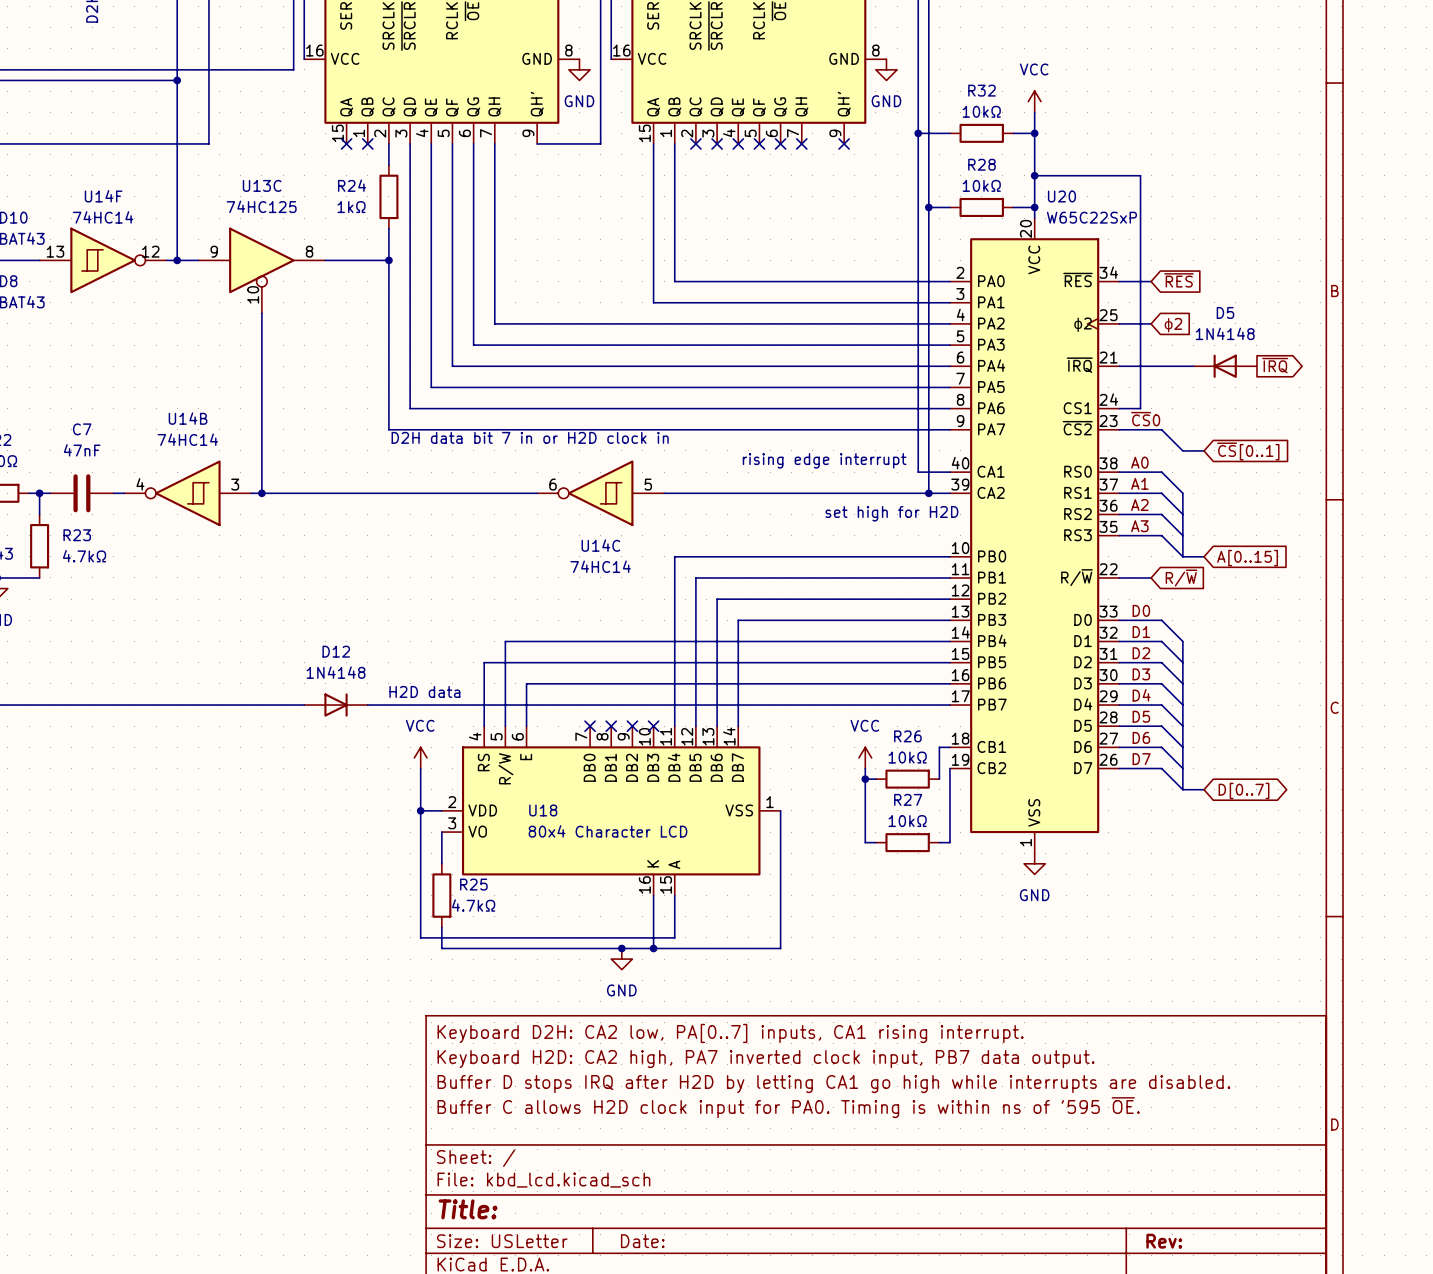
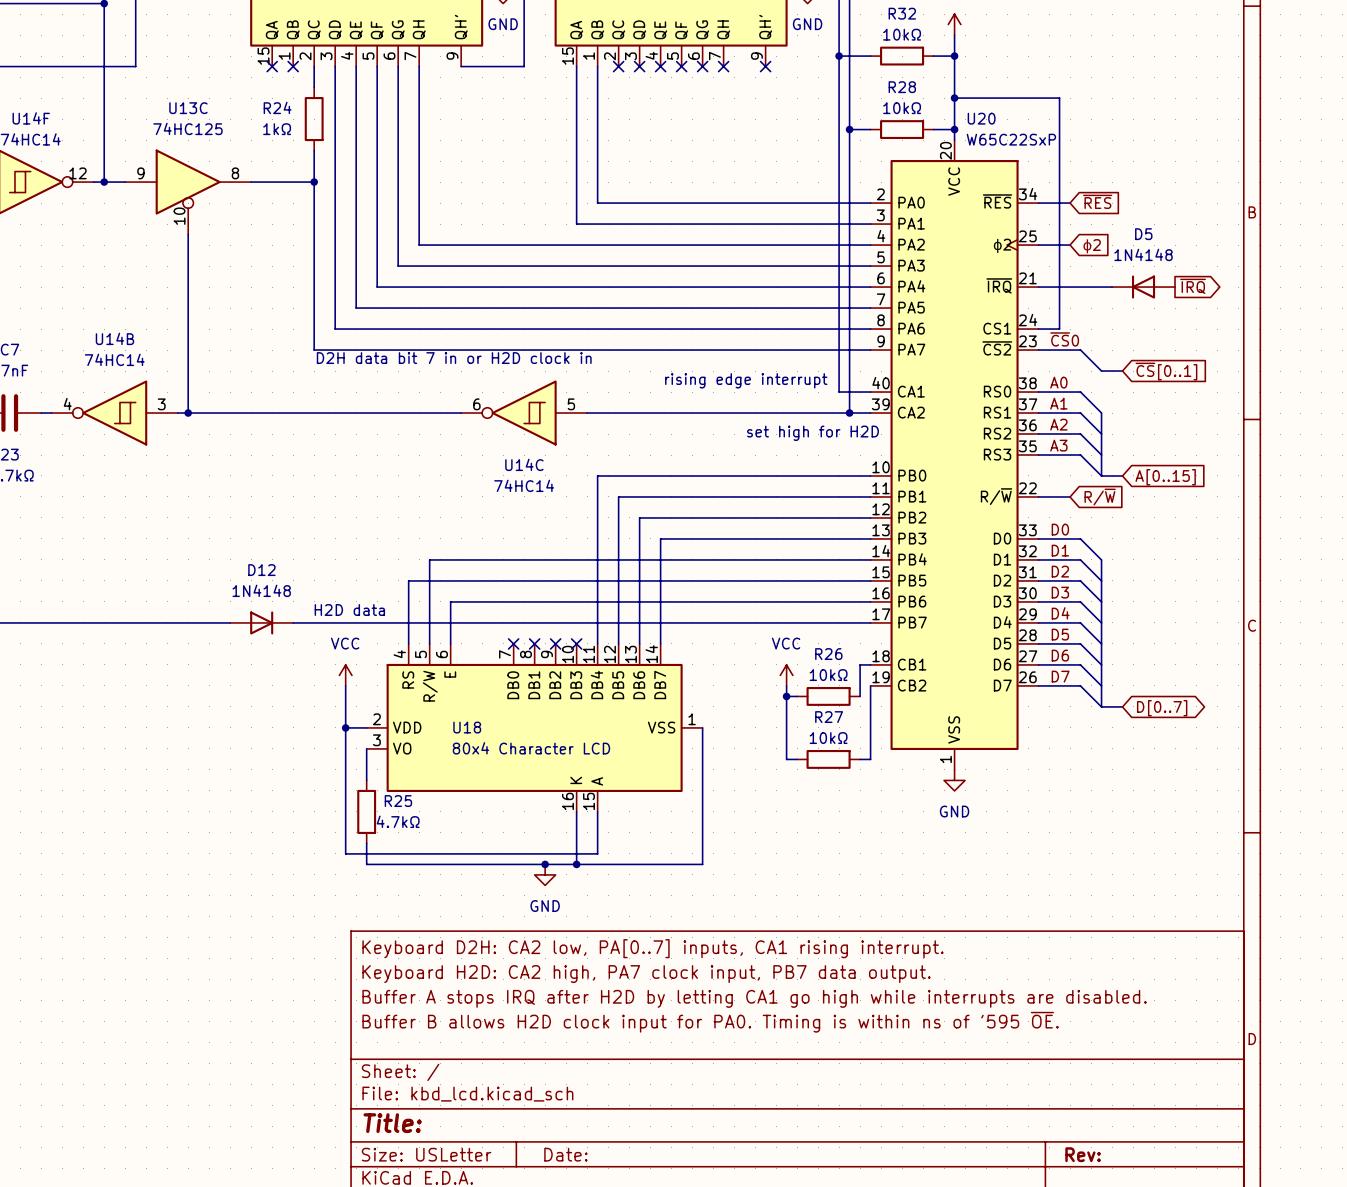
title block: Keyboard H2D: CA2 high, PA7 inverted clock input, PB7 data output. (766, 1059) -> Keyboard H2D: CA2 high, PA7 clock input, PB7 data output. (646, 974)
title block: Buffer D stops IRQ after H2D by letting CA1 go high while interrupts are disabled. (833, 1084) -> Buffer A stops IRQ after H2D by letting CA1 go high while interrupts are disabled. (754, 998)
title block: Buffer C allows H2D clock input for PA0. Timing is within ns of '595 ~{OE}. (788, 1107) -> Buffer B allows H2D clock input for PA0. Timing is within ns of '595 ~{OE}. (710, 1022)

